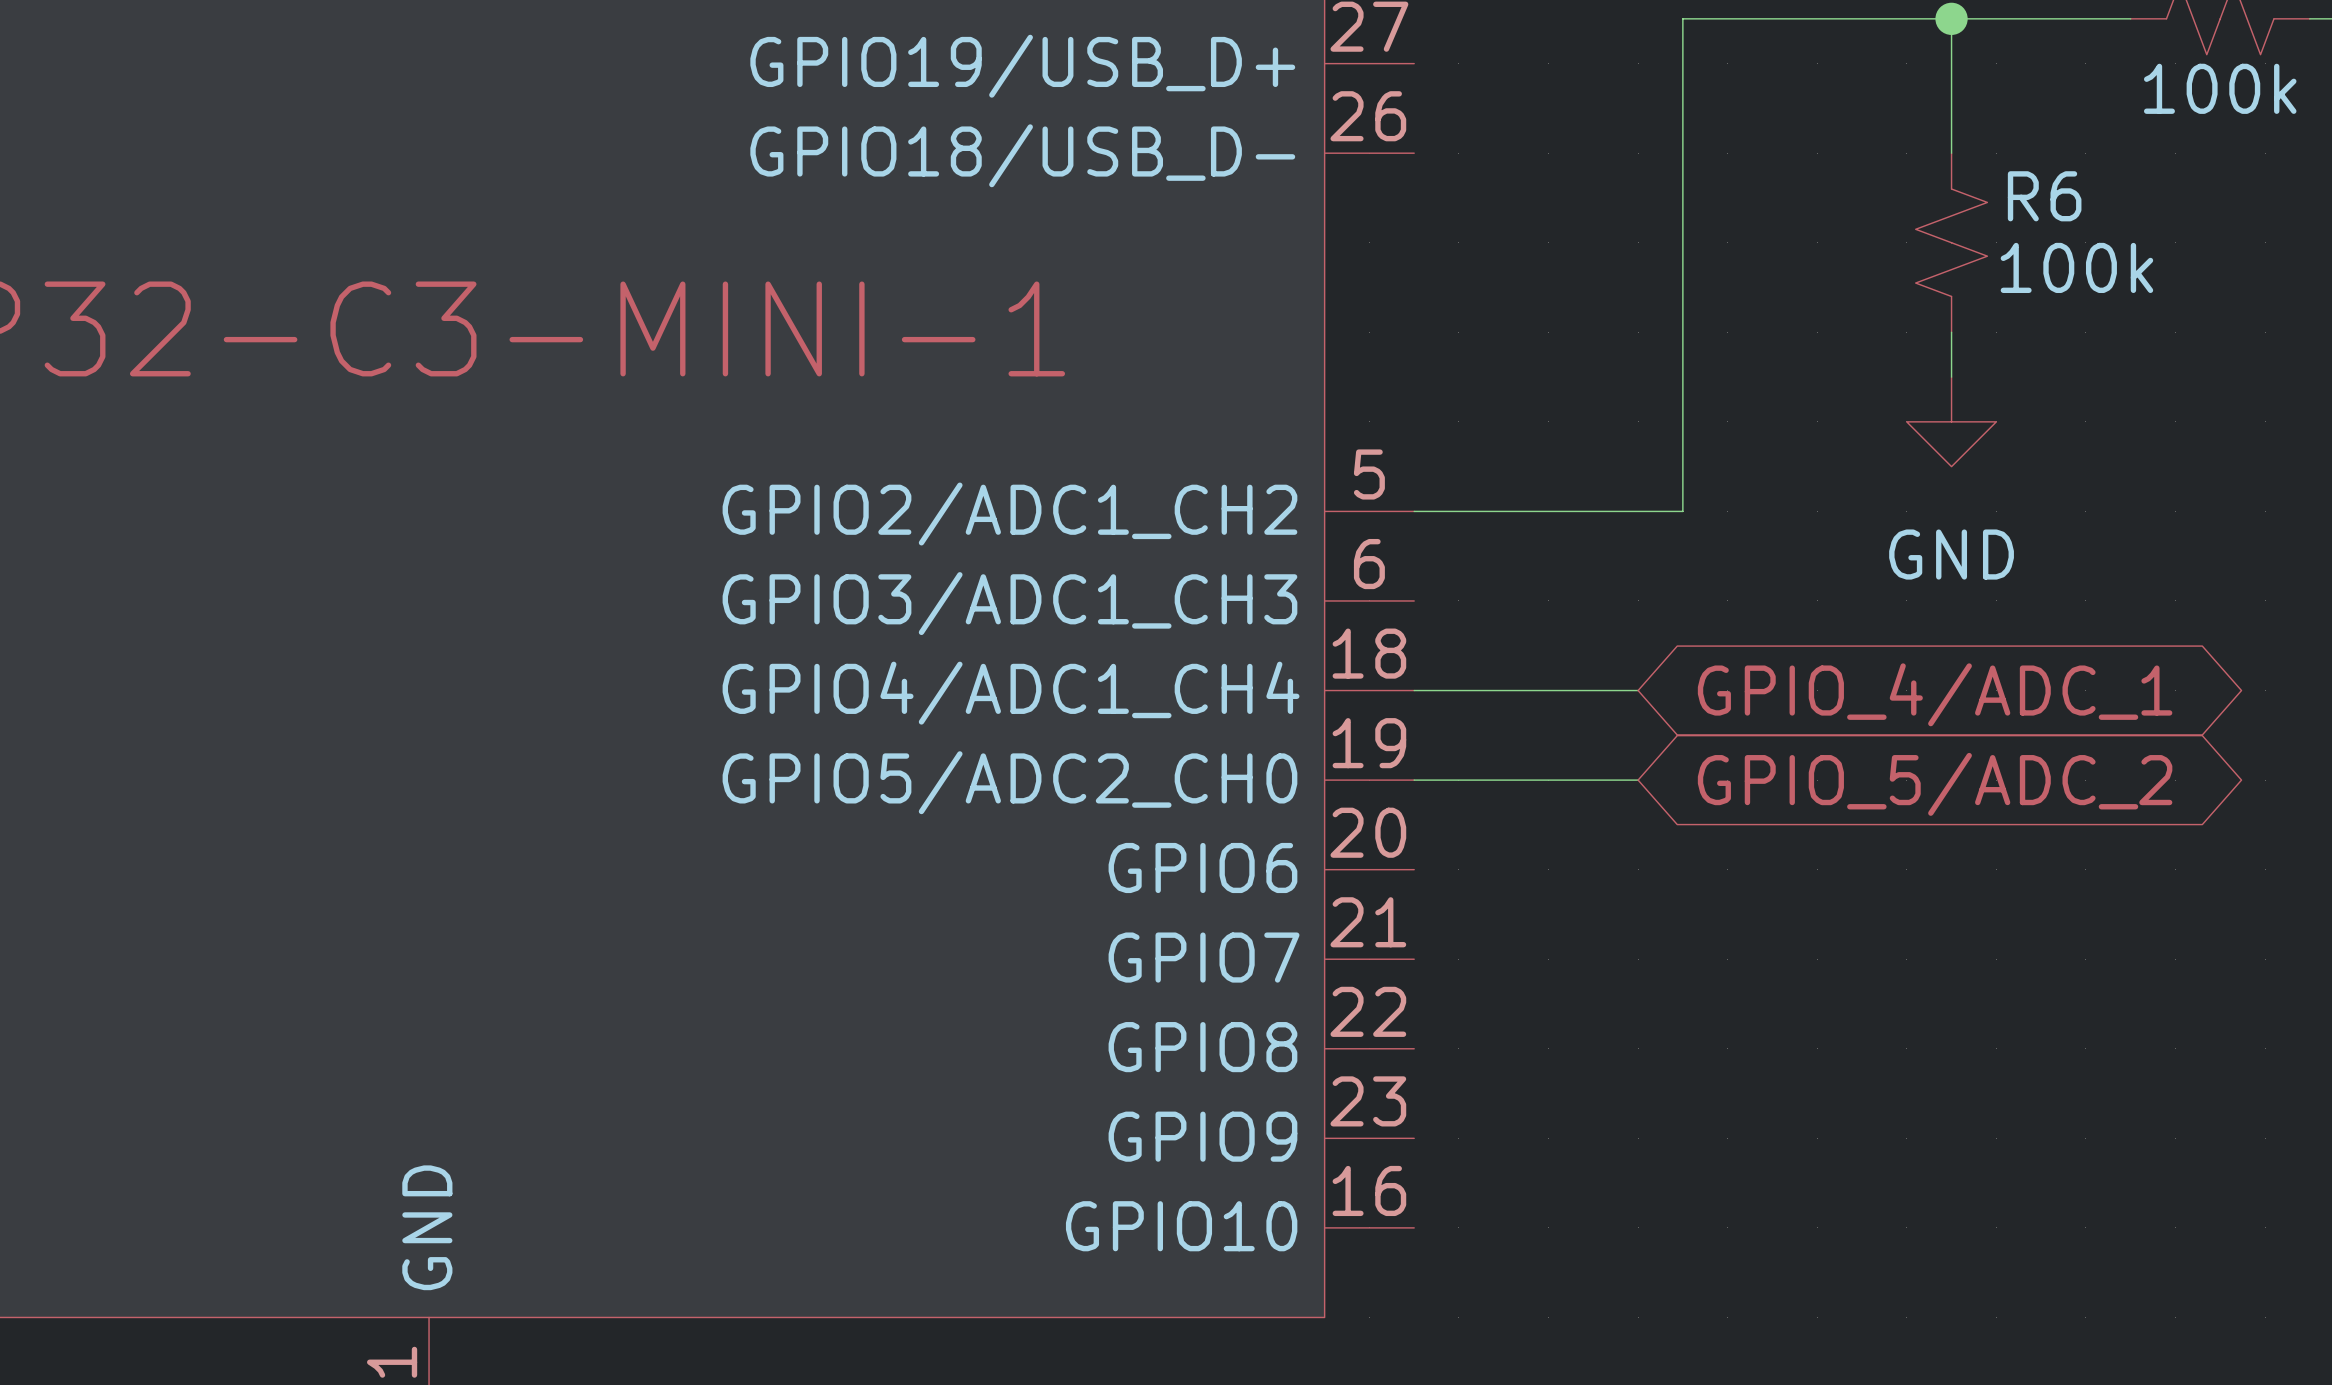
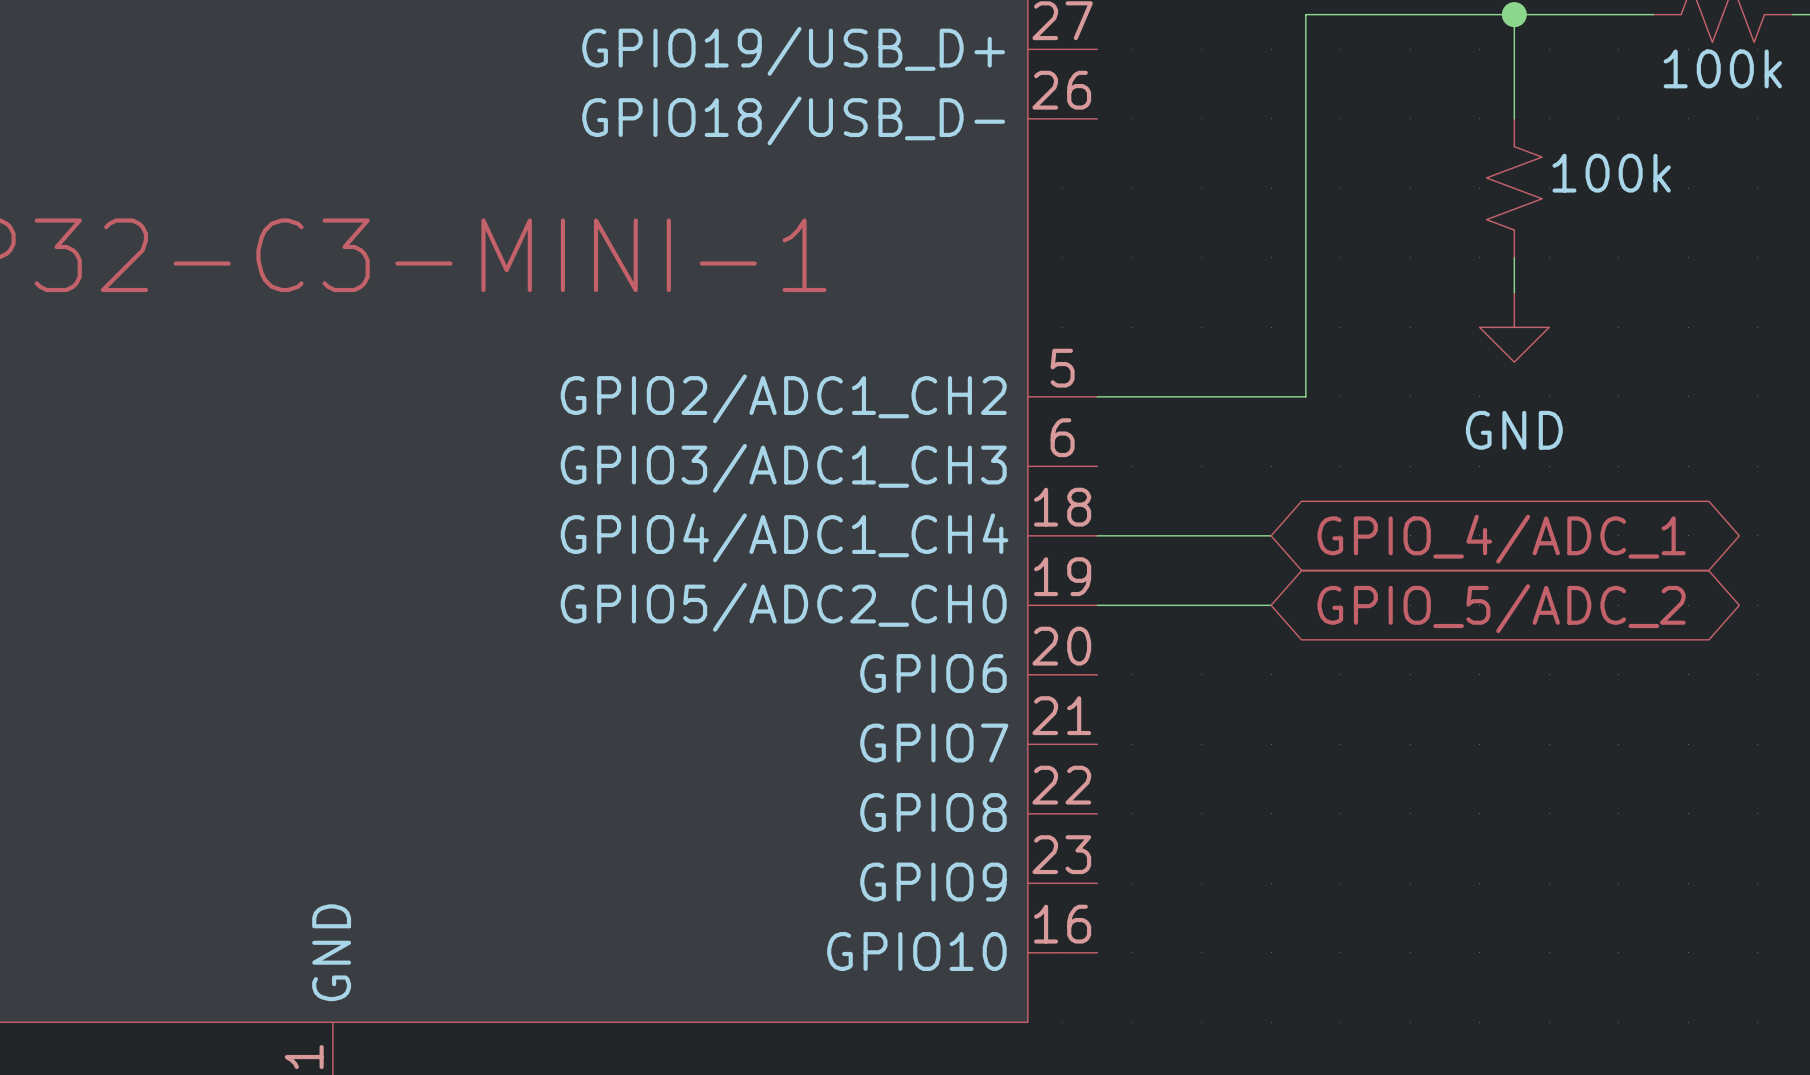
R6 name: R6 (2044, 196) -> none
R6 value position: 100k (2076, 267) -> 100k (1611, 173)

